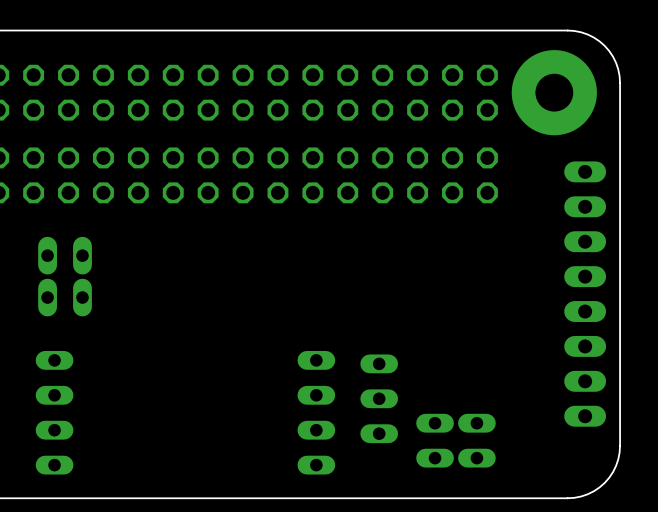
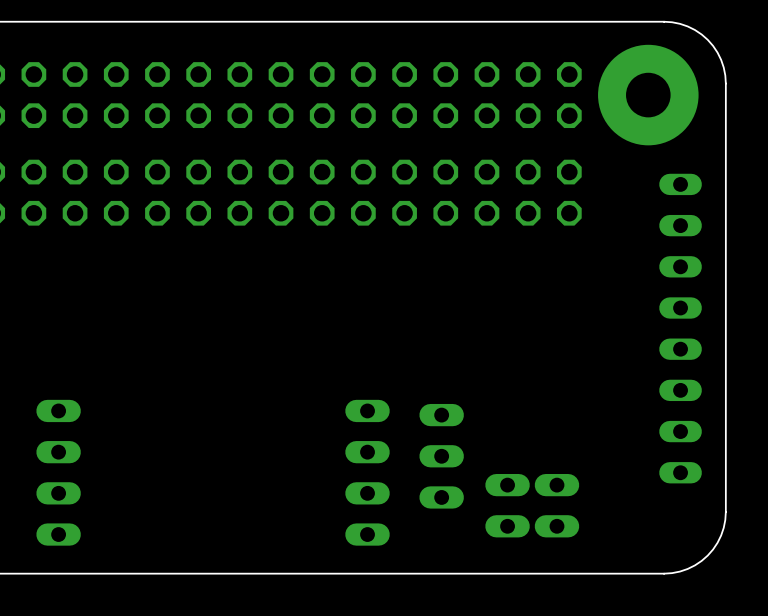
part: none -> (680, 246)
part: (65, 255) -> none
part: (585, 294) -> none
part: (65, 297) -> none
part: none -> (680, 410)

